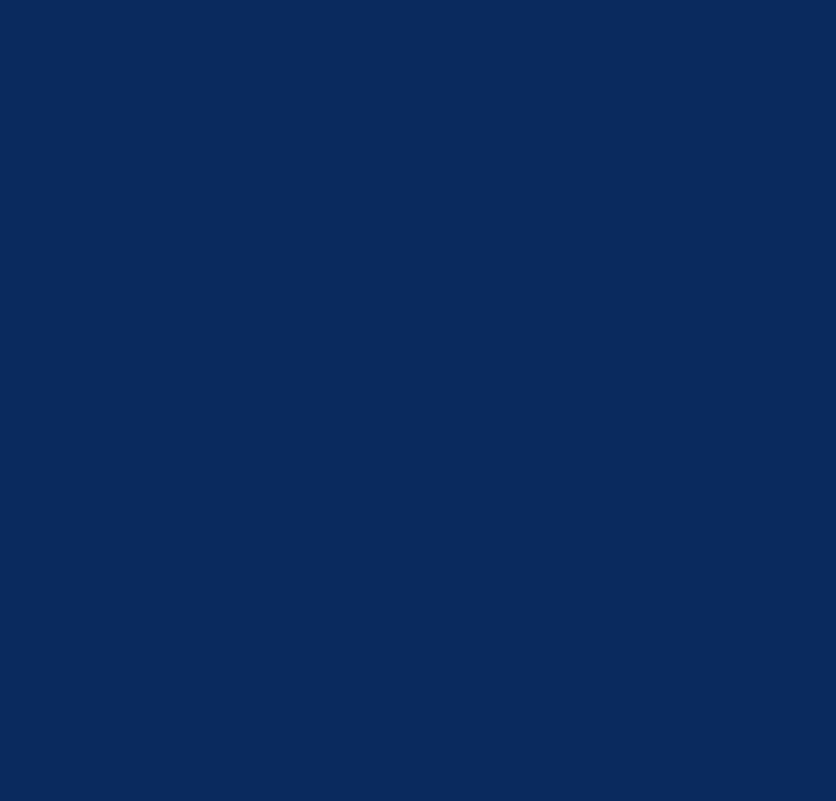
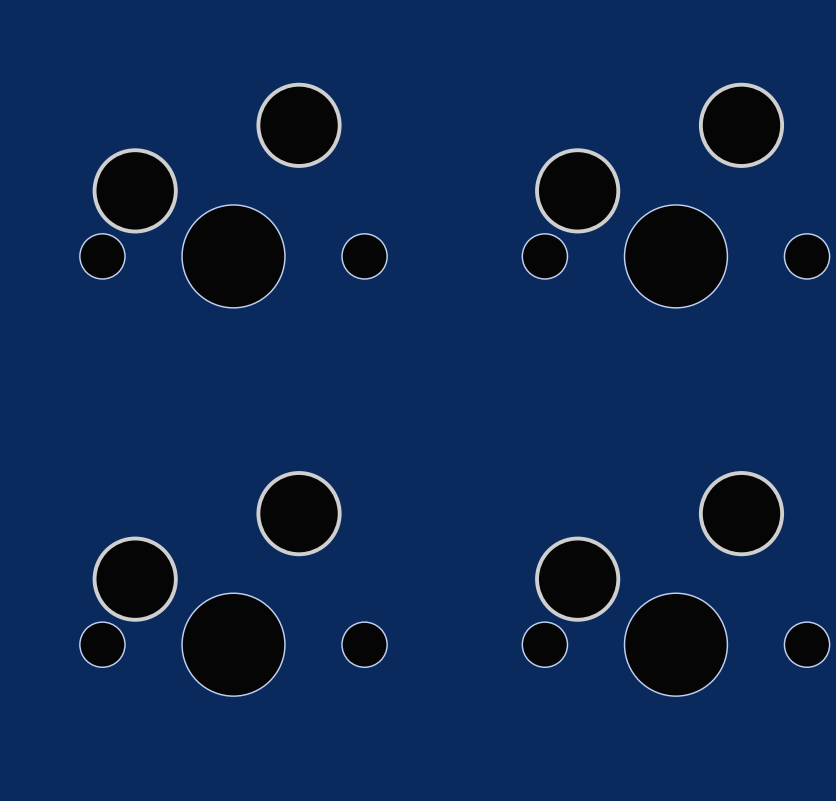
part: none -> (233, 195)
part: none -> (675, 195)
part: none -> (233, 583)
part: none -> (675, 583)

